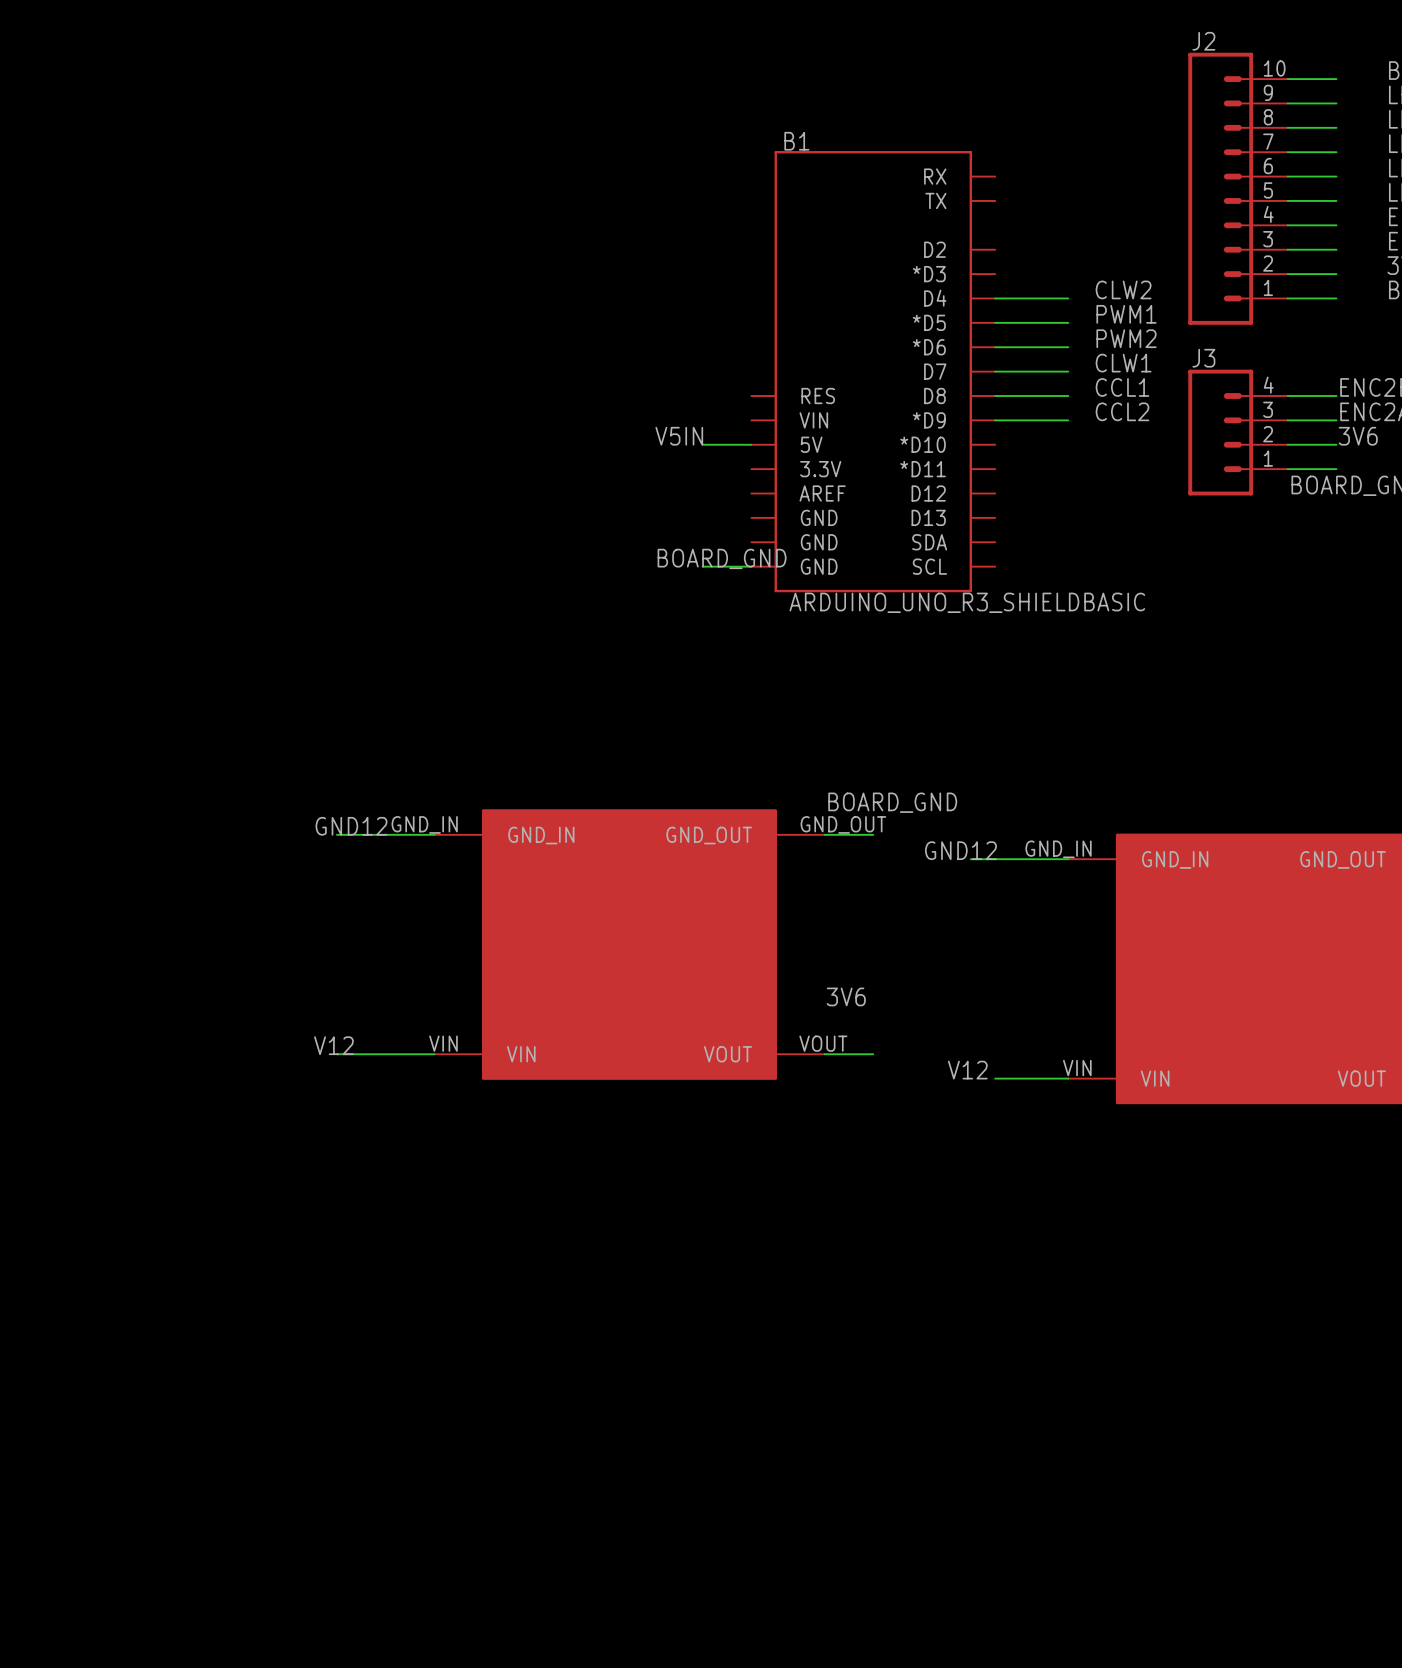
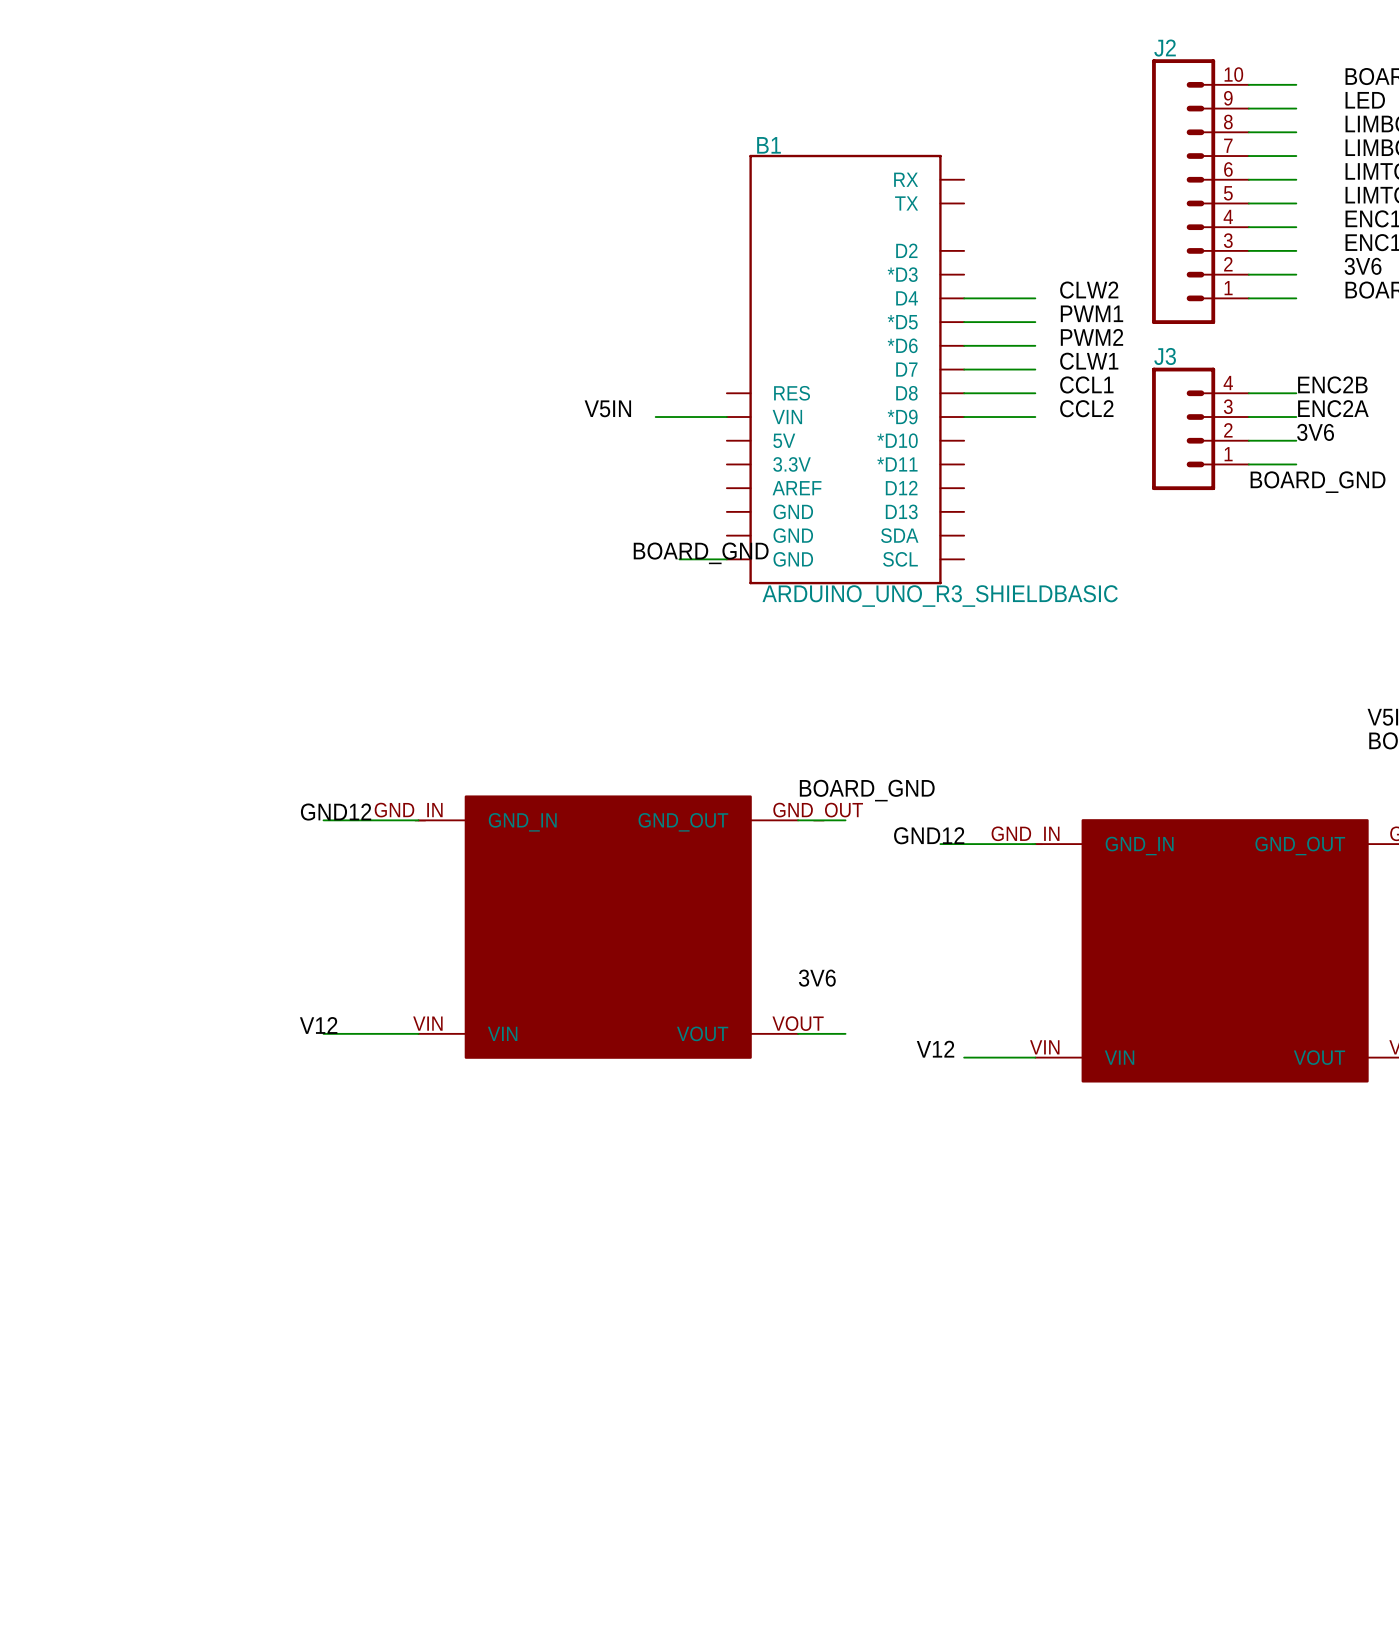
wire: none -> (655, 417) (726, 417)
label position: V5IN (679, 436) -> V5IN (607, 408)
wire: (702, 444) (751, 444) -> none

